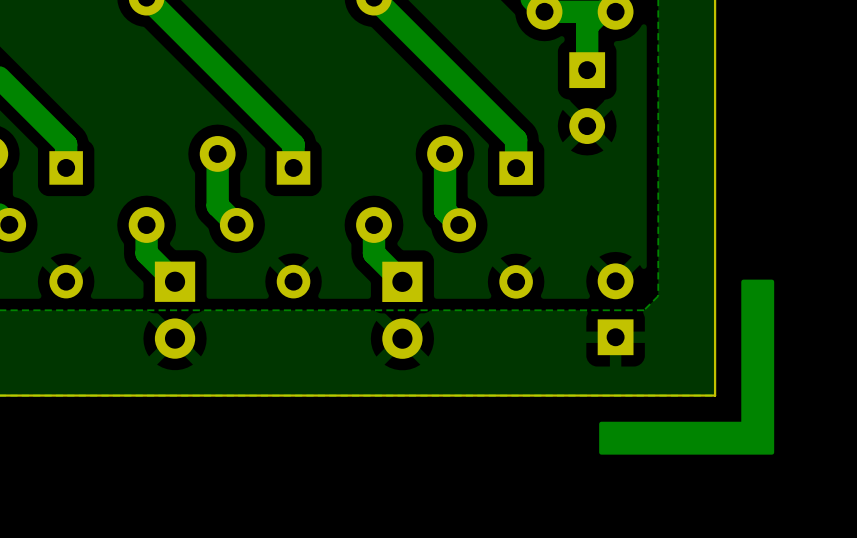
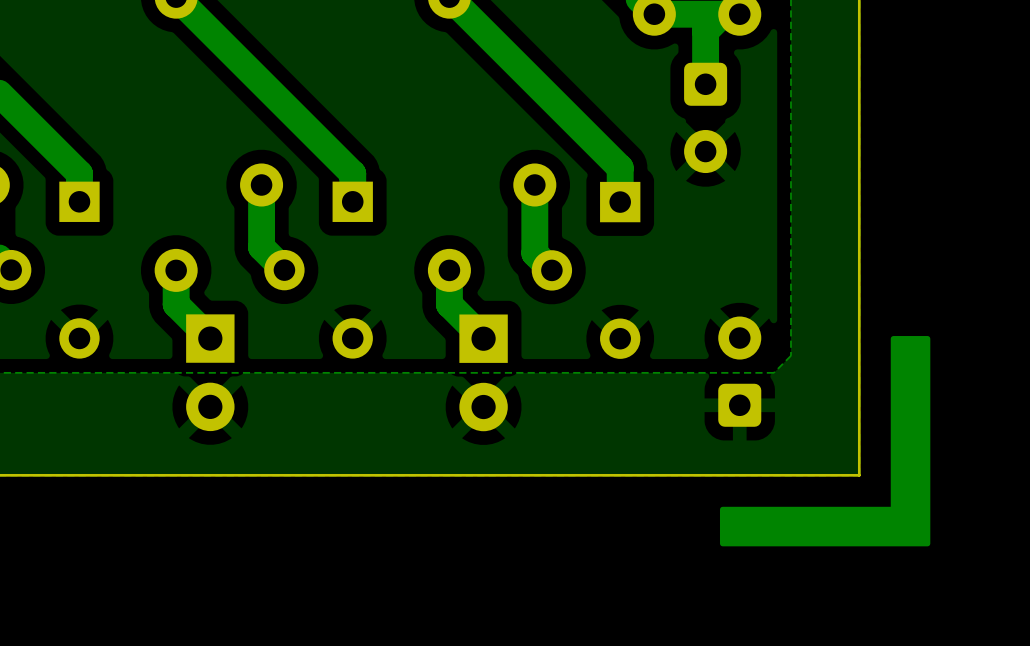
part footprint: [569, 52, 606, 144] -> [684, 62, 728, 174]
part footprint: [597, 263, 634, 356] -> [718, 316, 762, 427]

